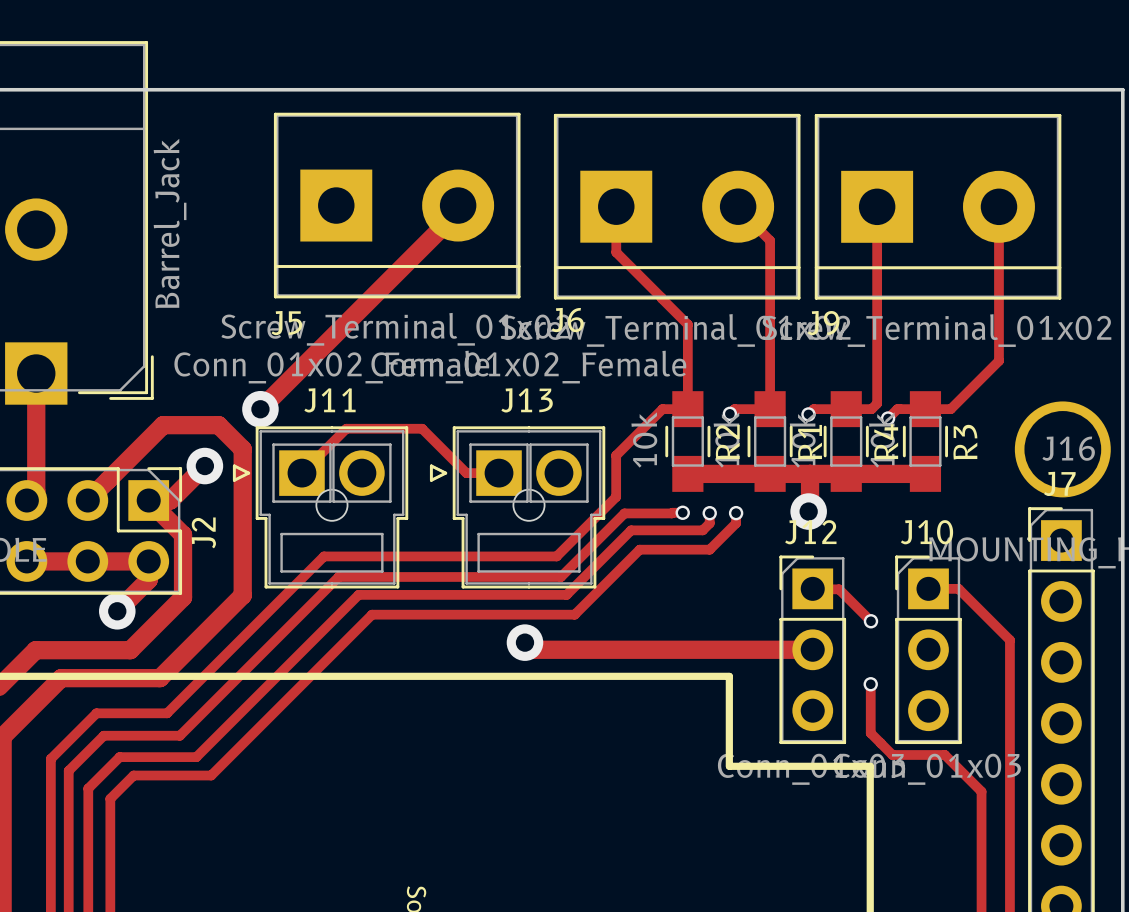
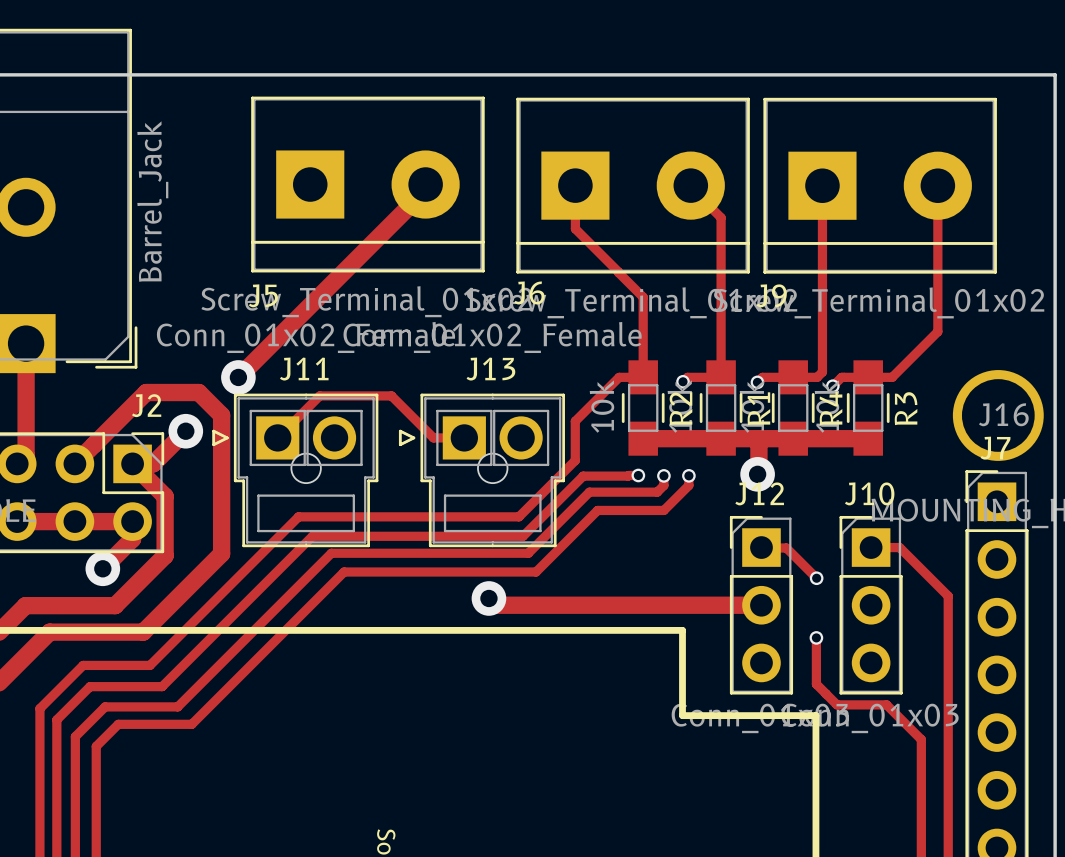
J2 name rotation: 0° (203, 532) -> 90° clockwise (146, 405)
J2 name position: J2 (203, 532) -> J2 (146, 405)

